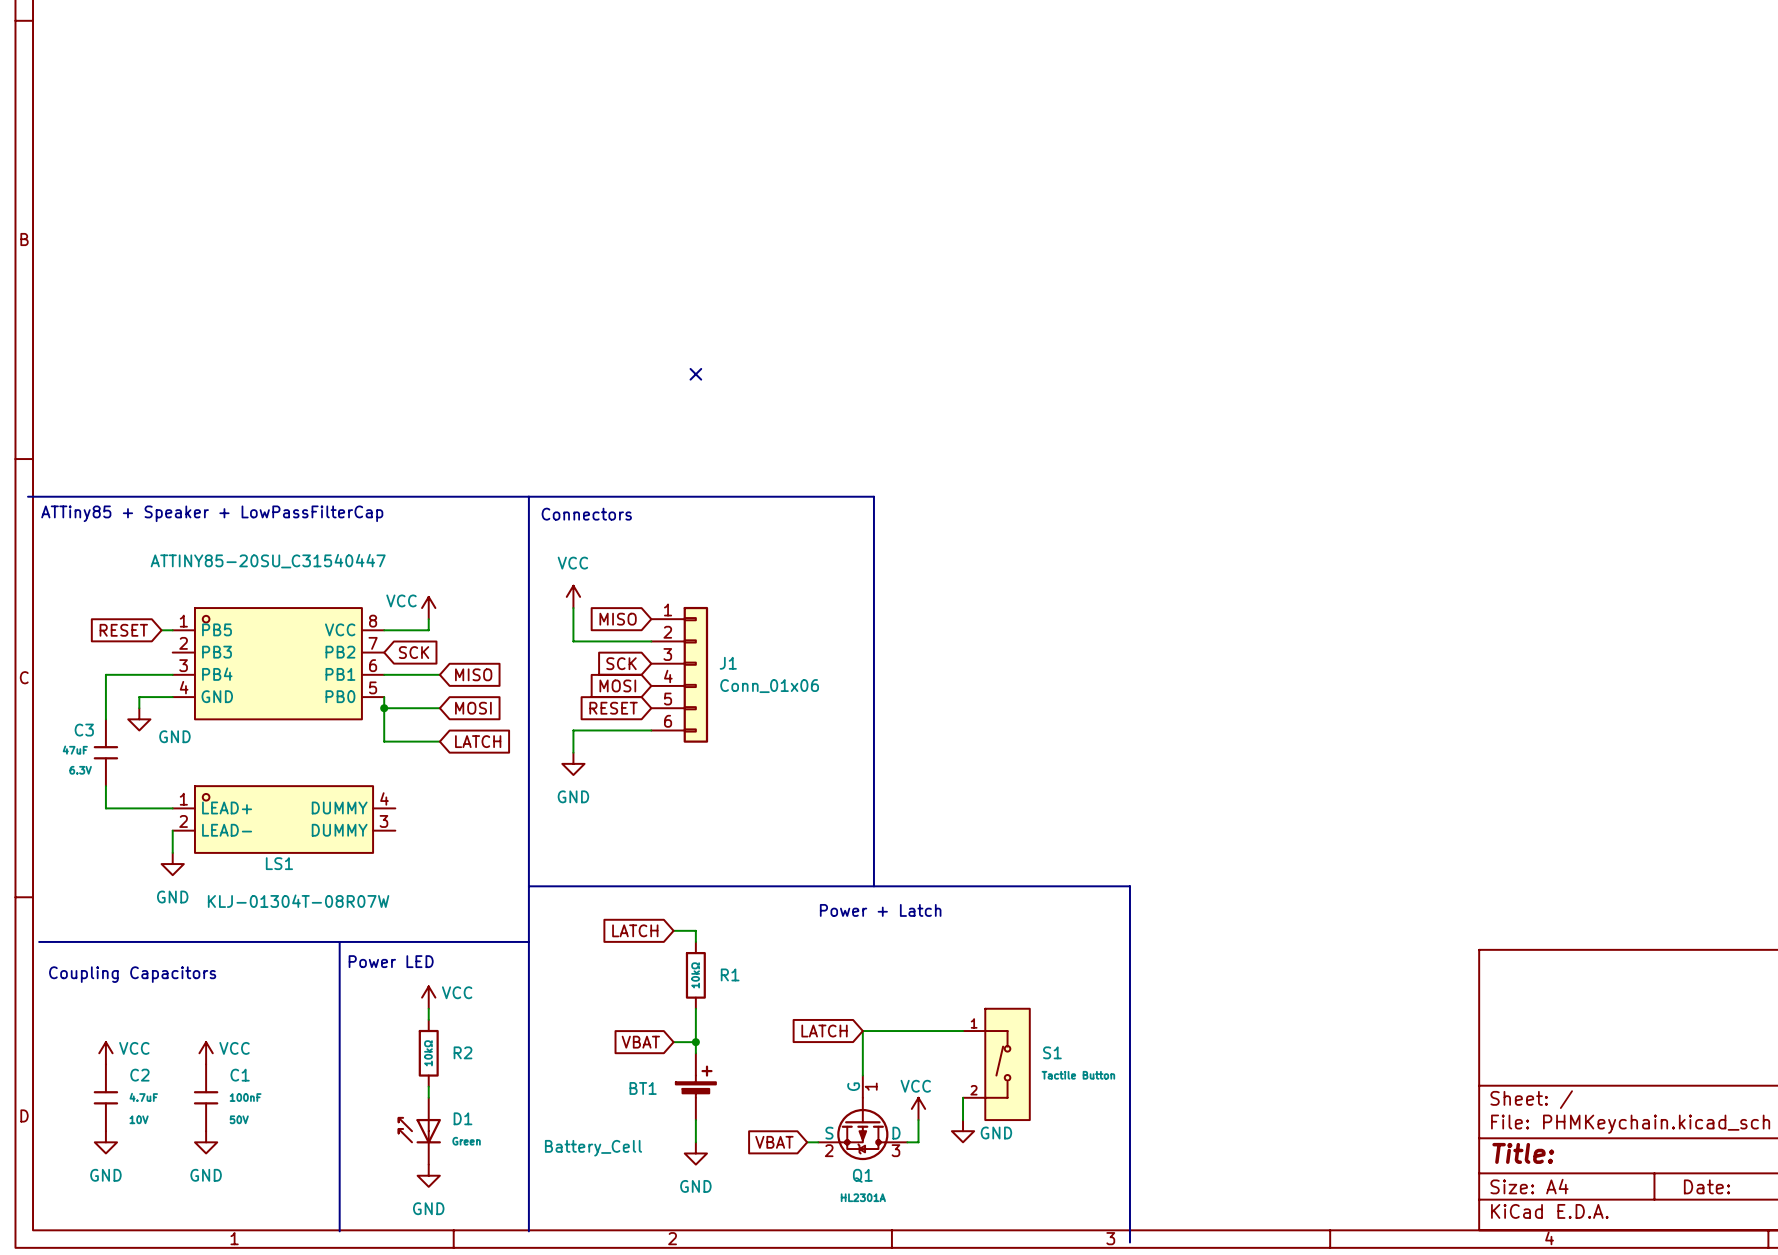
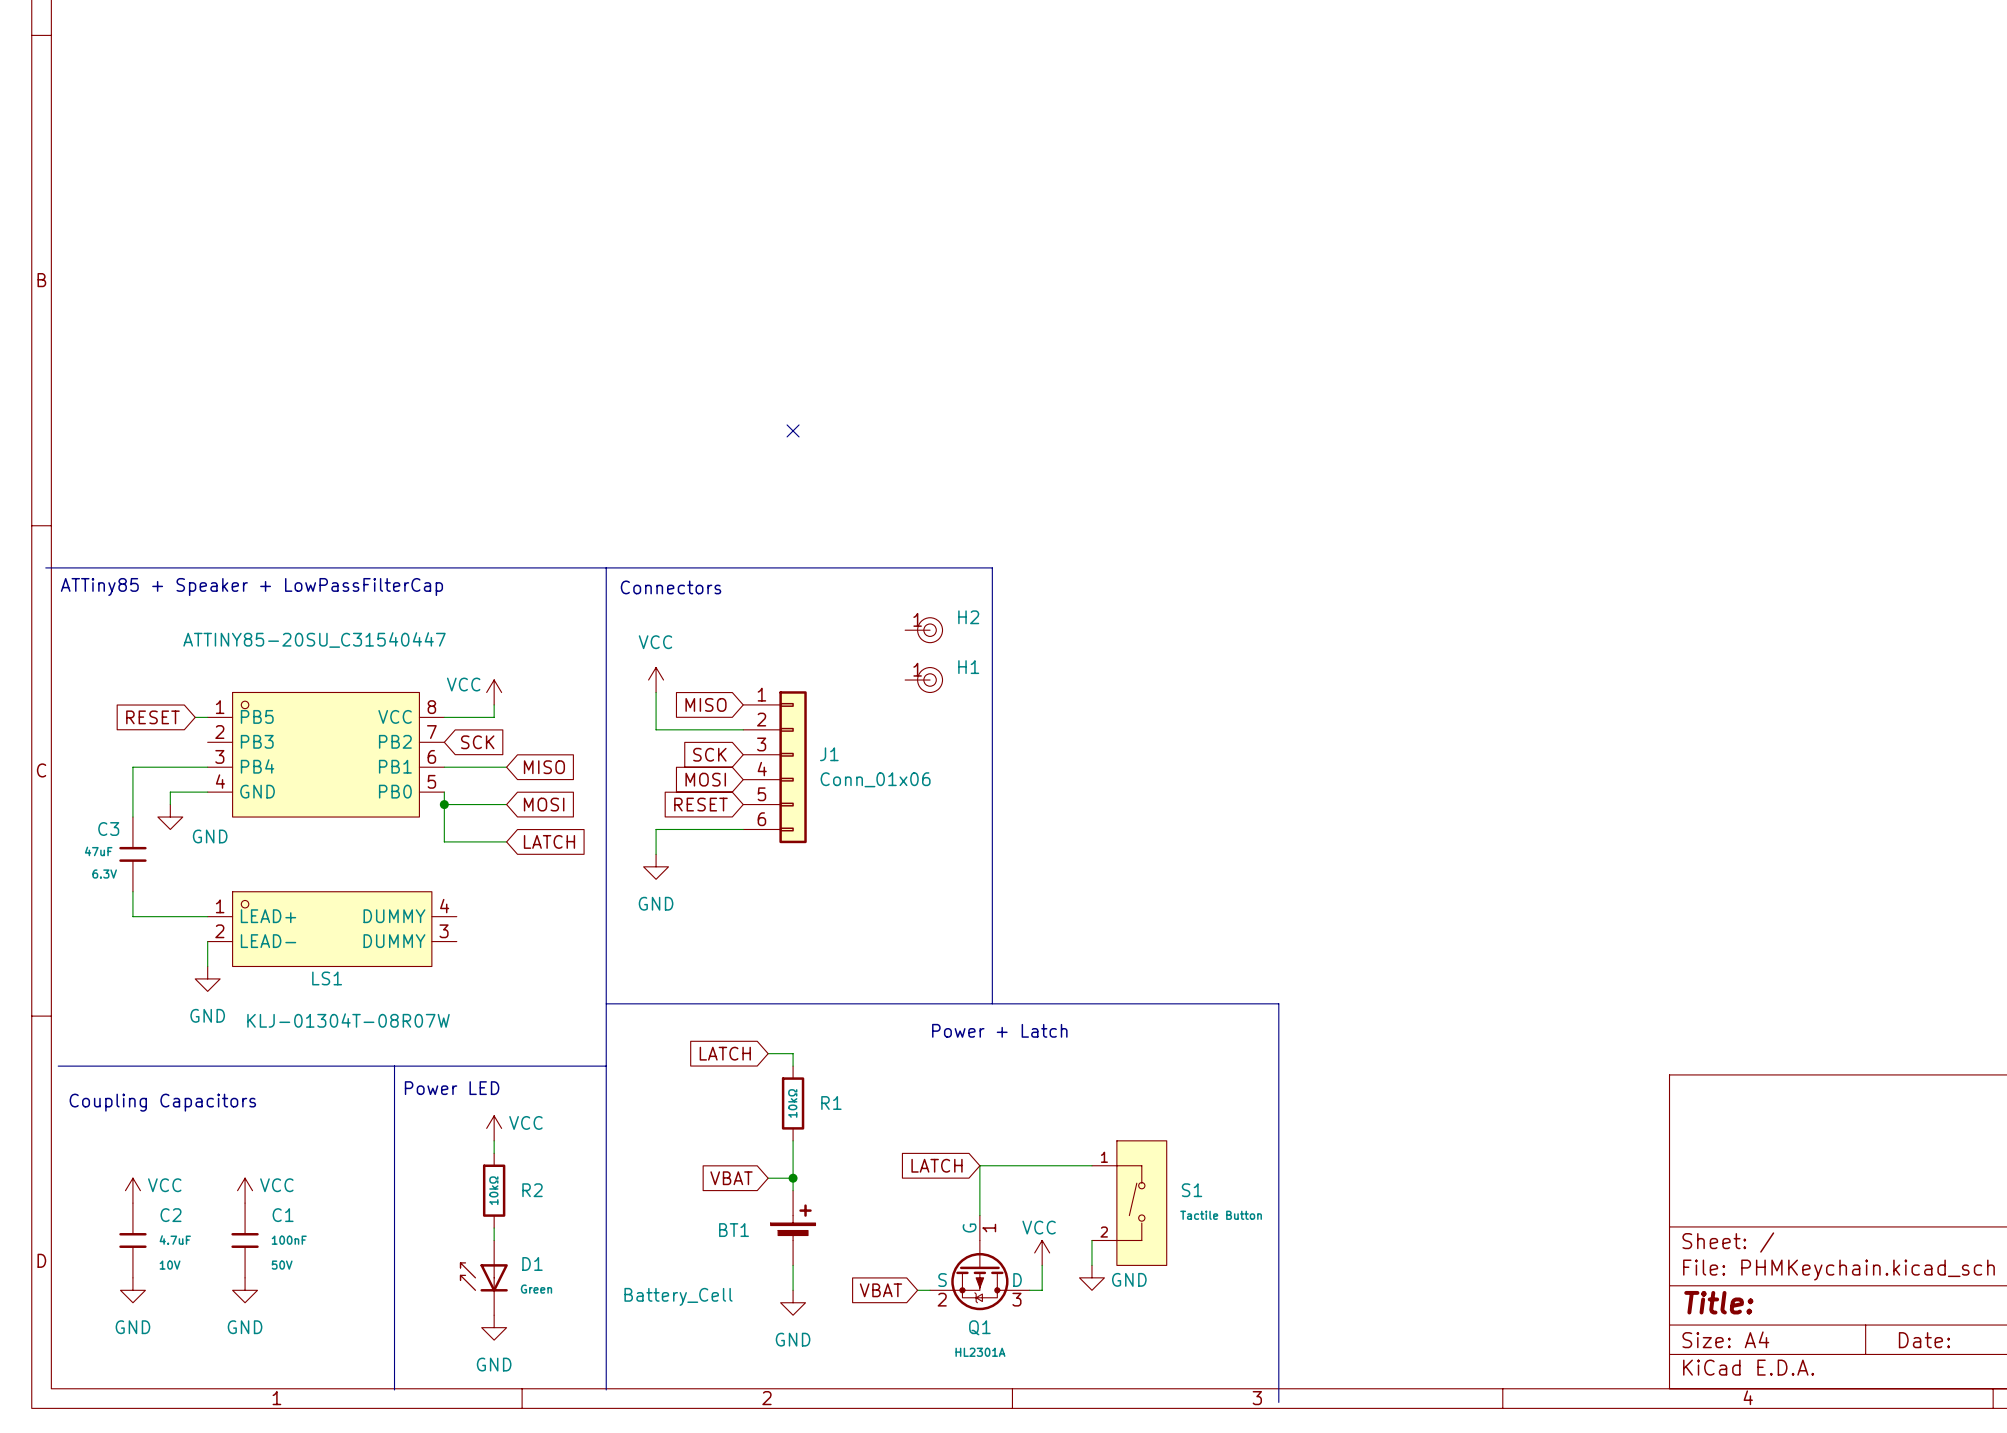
H2: none -> (923, 630)
H1: none -> (923, 680)

